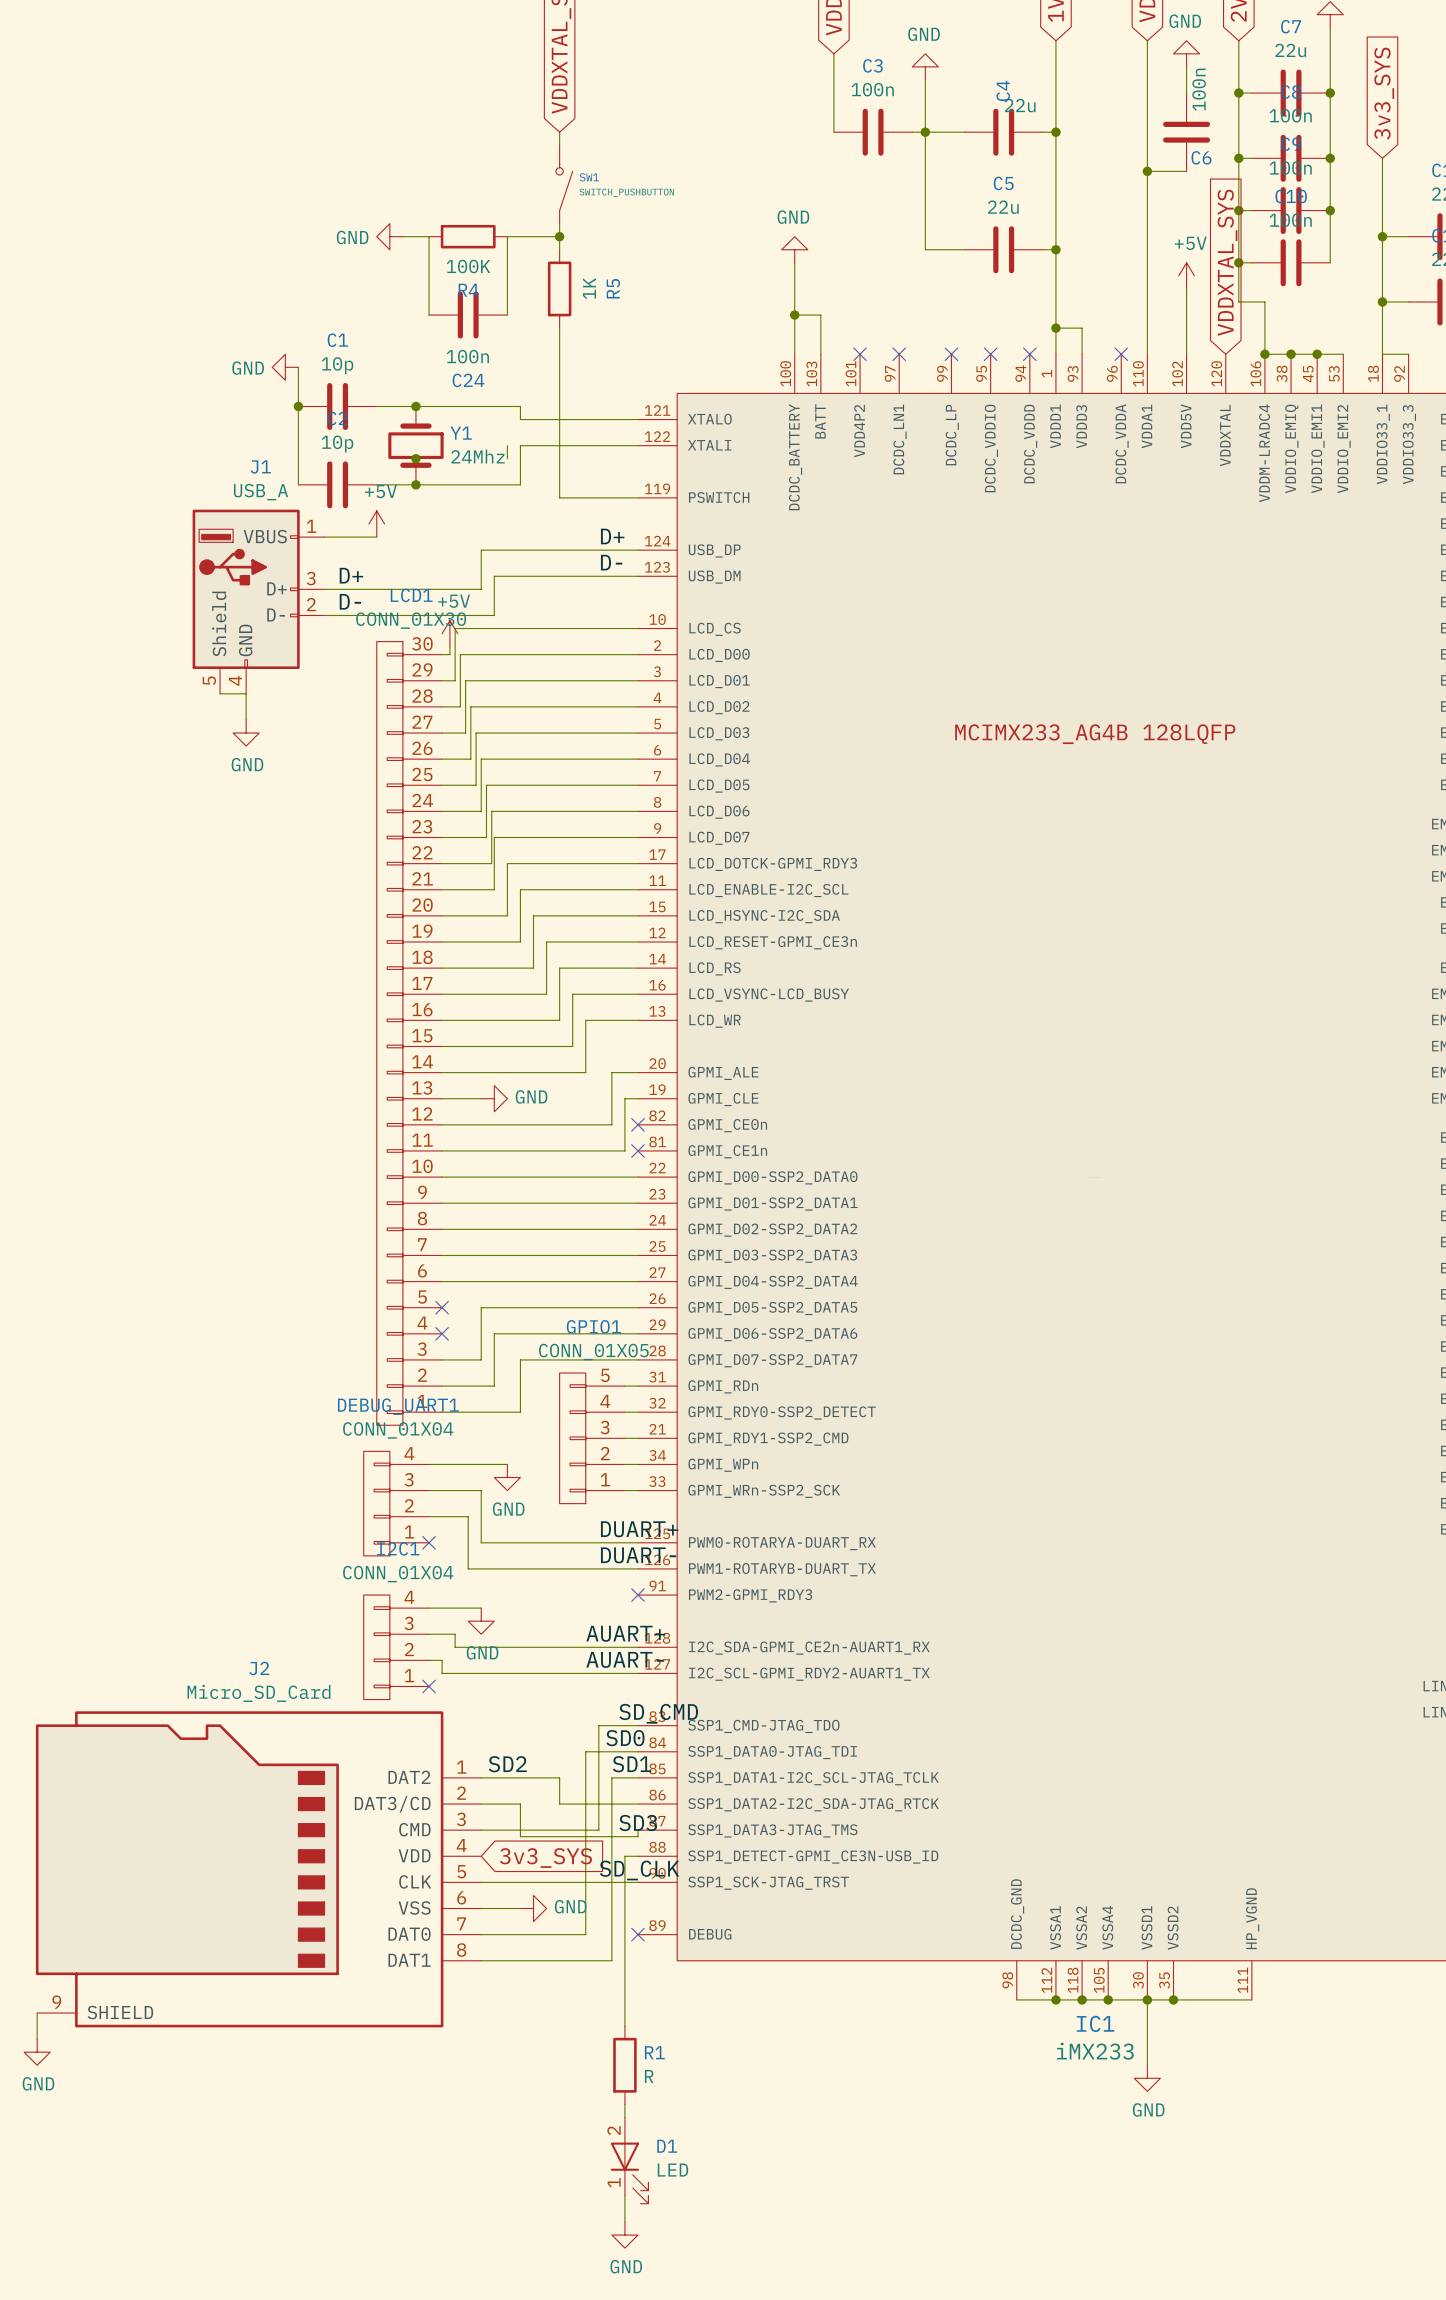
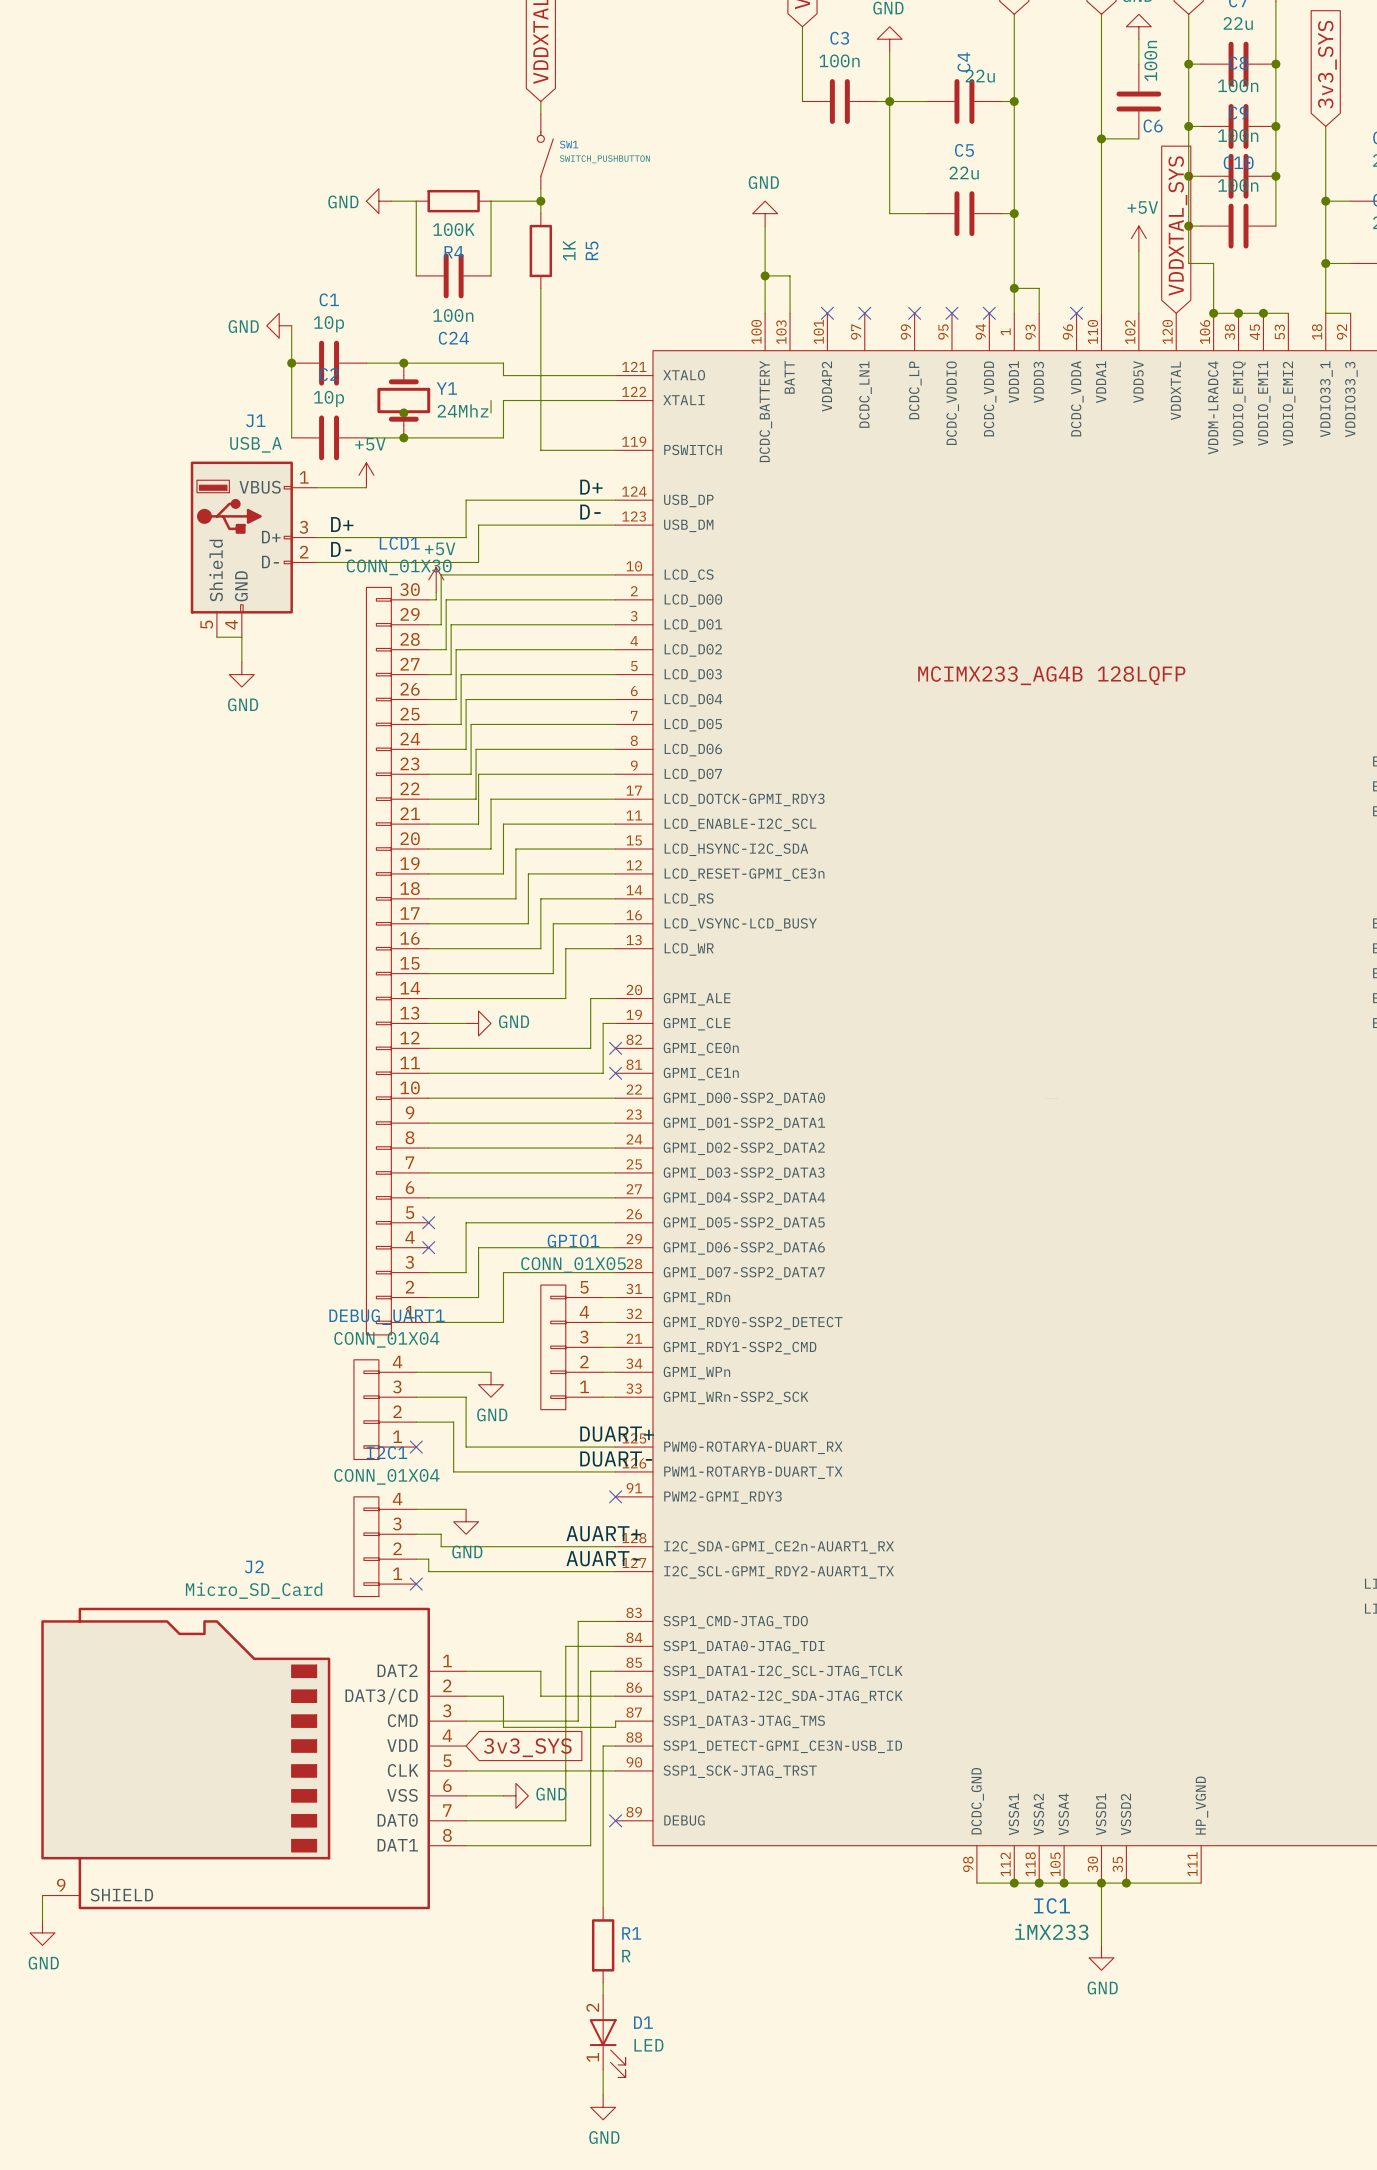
label: SD_CMD (658, 1713) -> none
label: SD0 (625, 1738) -> none
label: SD2 (507, 1764) -> none
label: SD1 (632, 1764) -> none
label: SD3 (638, 1823) -> none
label: SD_CLK (639, 1870) -> none

